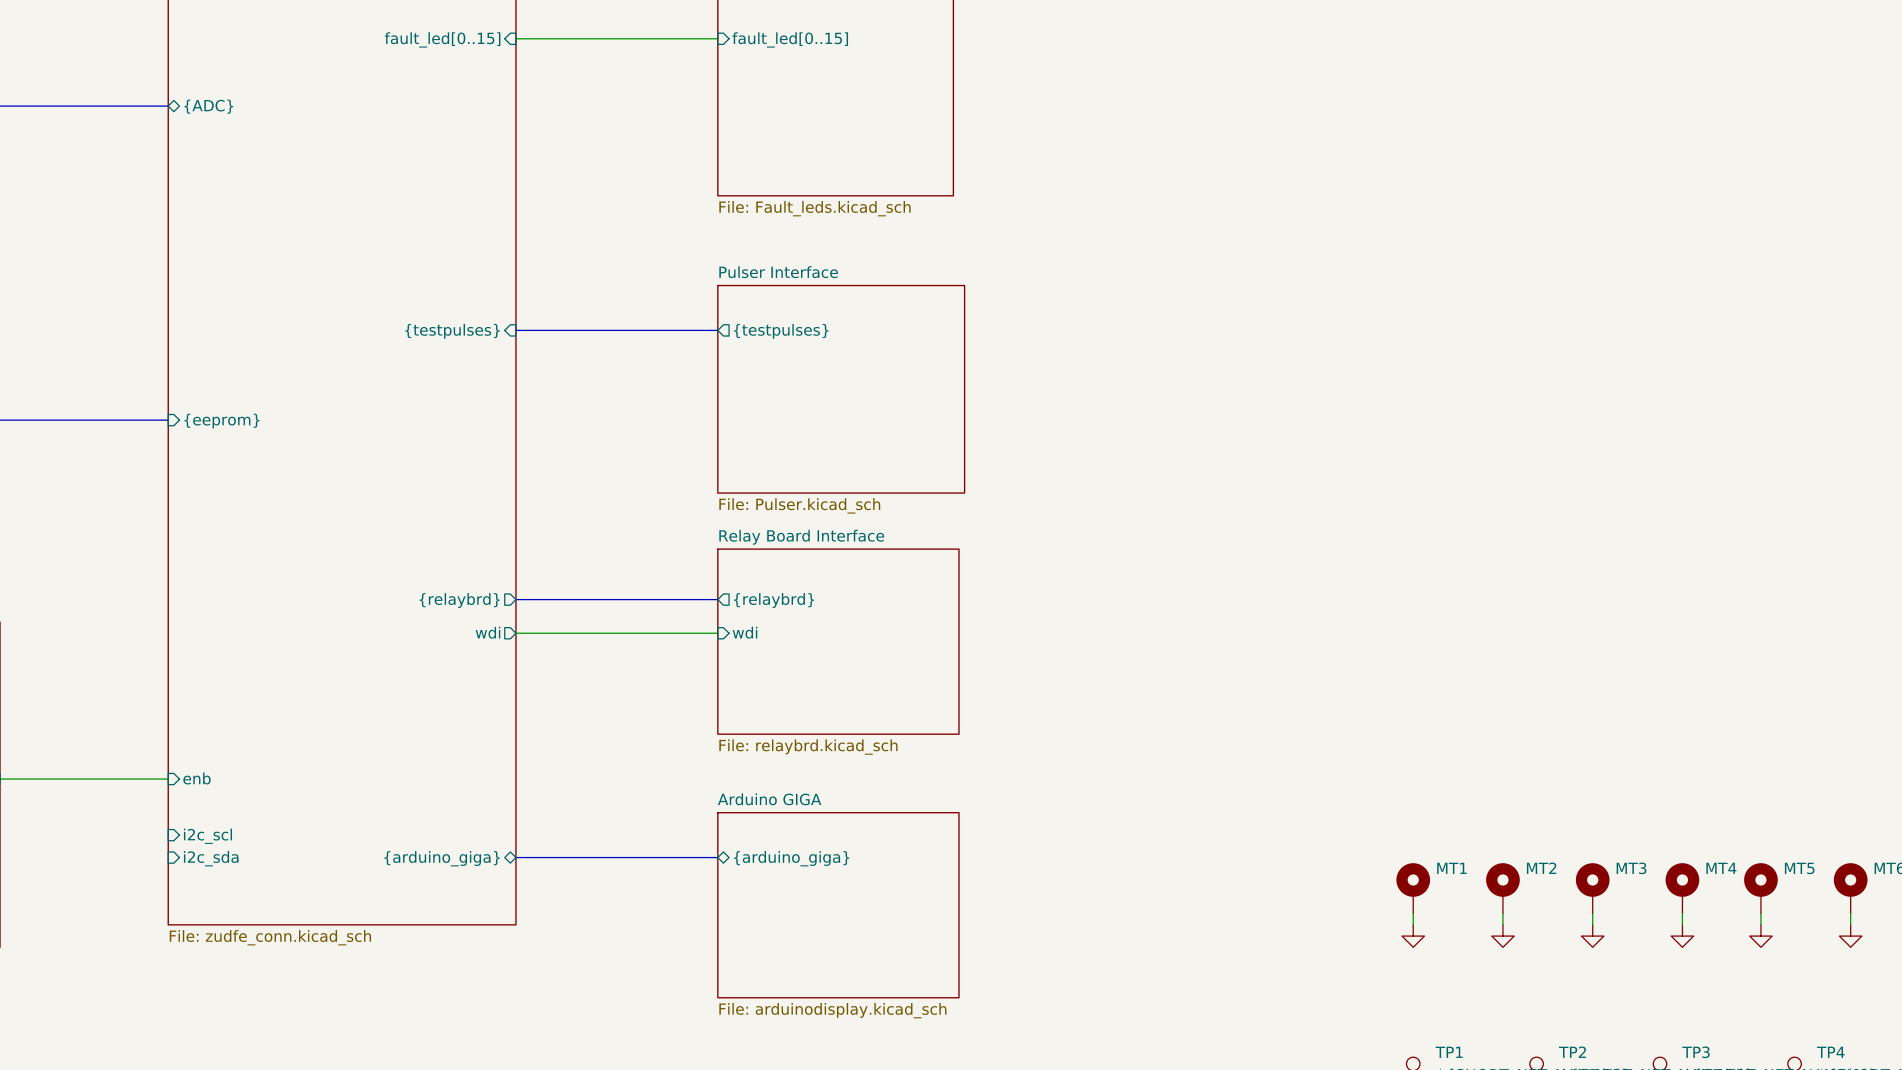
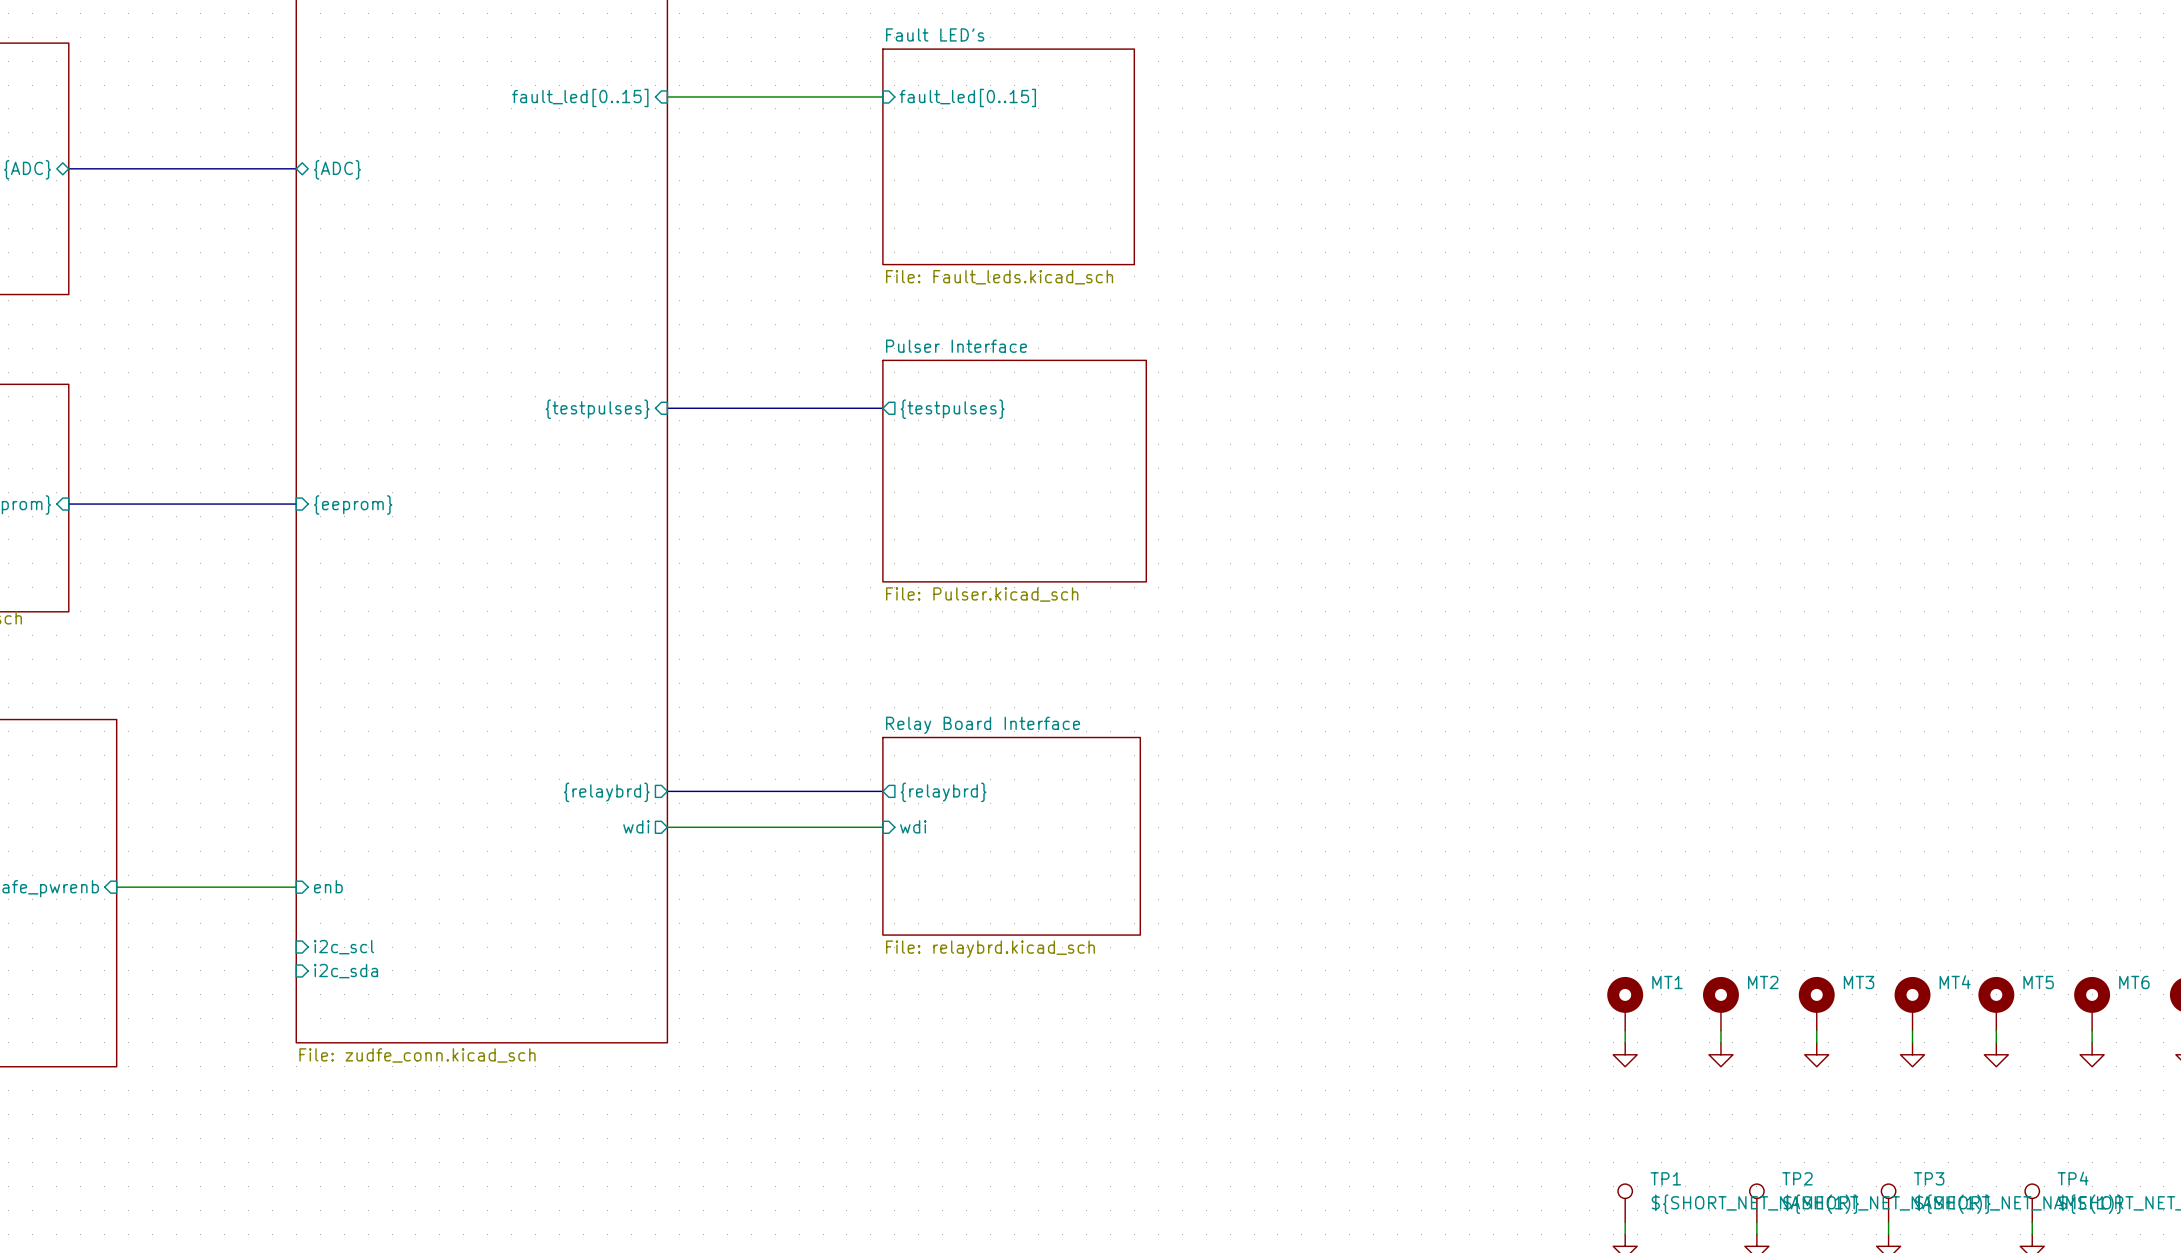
bus: (515, 599) (717, 599) -> (667, 791) (882, 791)
sheet pin position: {relaybrd} (459, 600) -> {relaybrd} (606, 792)
sheet pin position: {relaybrd} (774, 600) -> {relaybrd} (943, 792)
sheet pin position: wdi (487, 632) -> wdi (636, 826)
sheet pin position: wdi (745, 632) -> wdi (913, 826)
wire: (515, 633) (717, 633) -> (667, 827) (882, 827)
sheet Relay Board Interface position: (838, 641) -> (1011, 836)
bus: (515, 857) (717, 857) -> none
sheet pin: {arduino_giga} (442, 858) -> none
sheet pin: {arduino_giga} (791, 858) -> none
sheet Arduino GIGA: File: arduinodisplay.kicad_sch (838, 905) -> none

